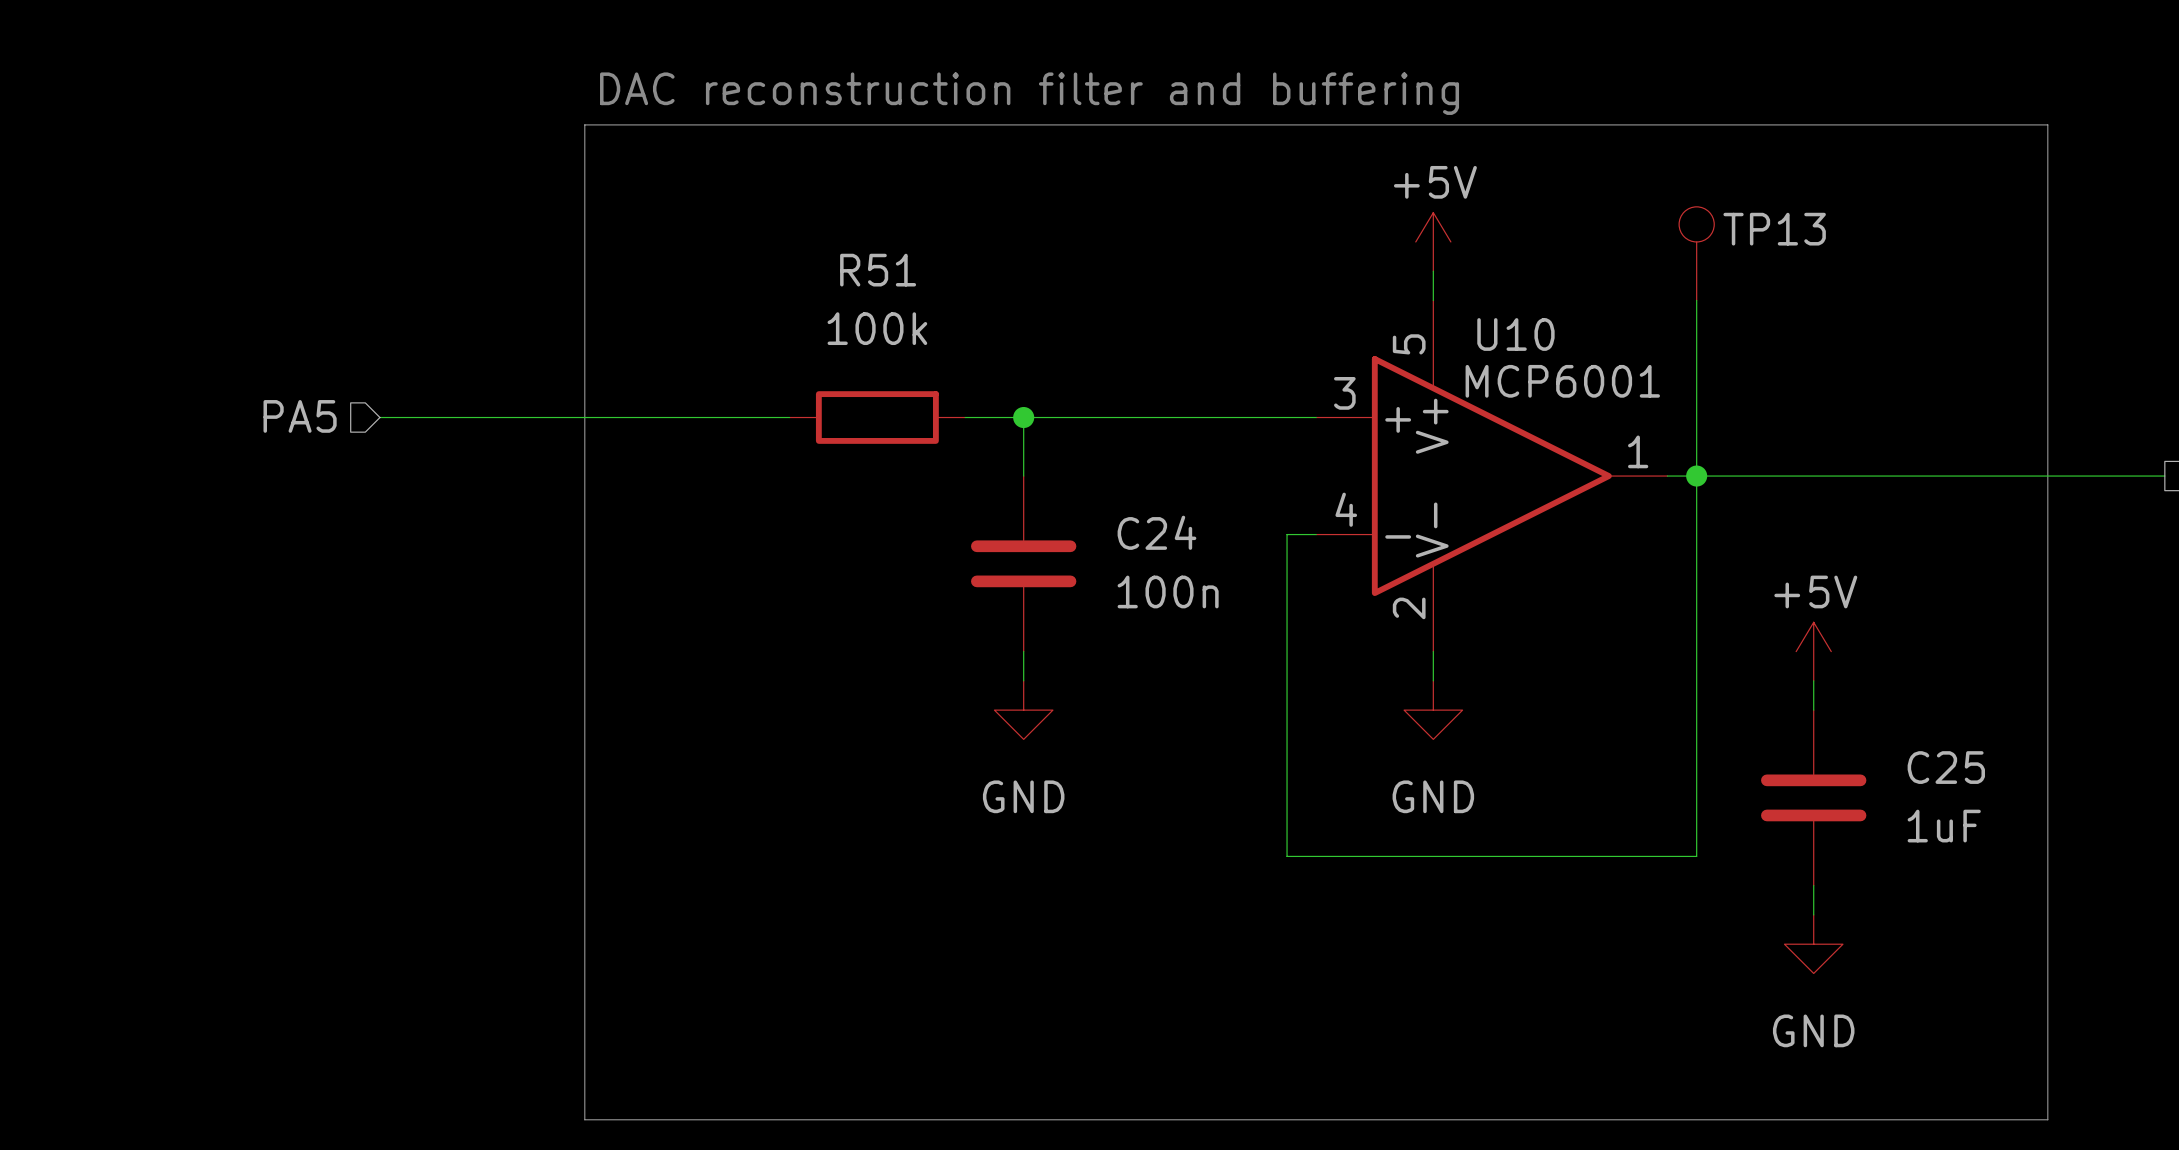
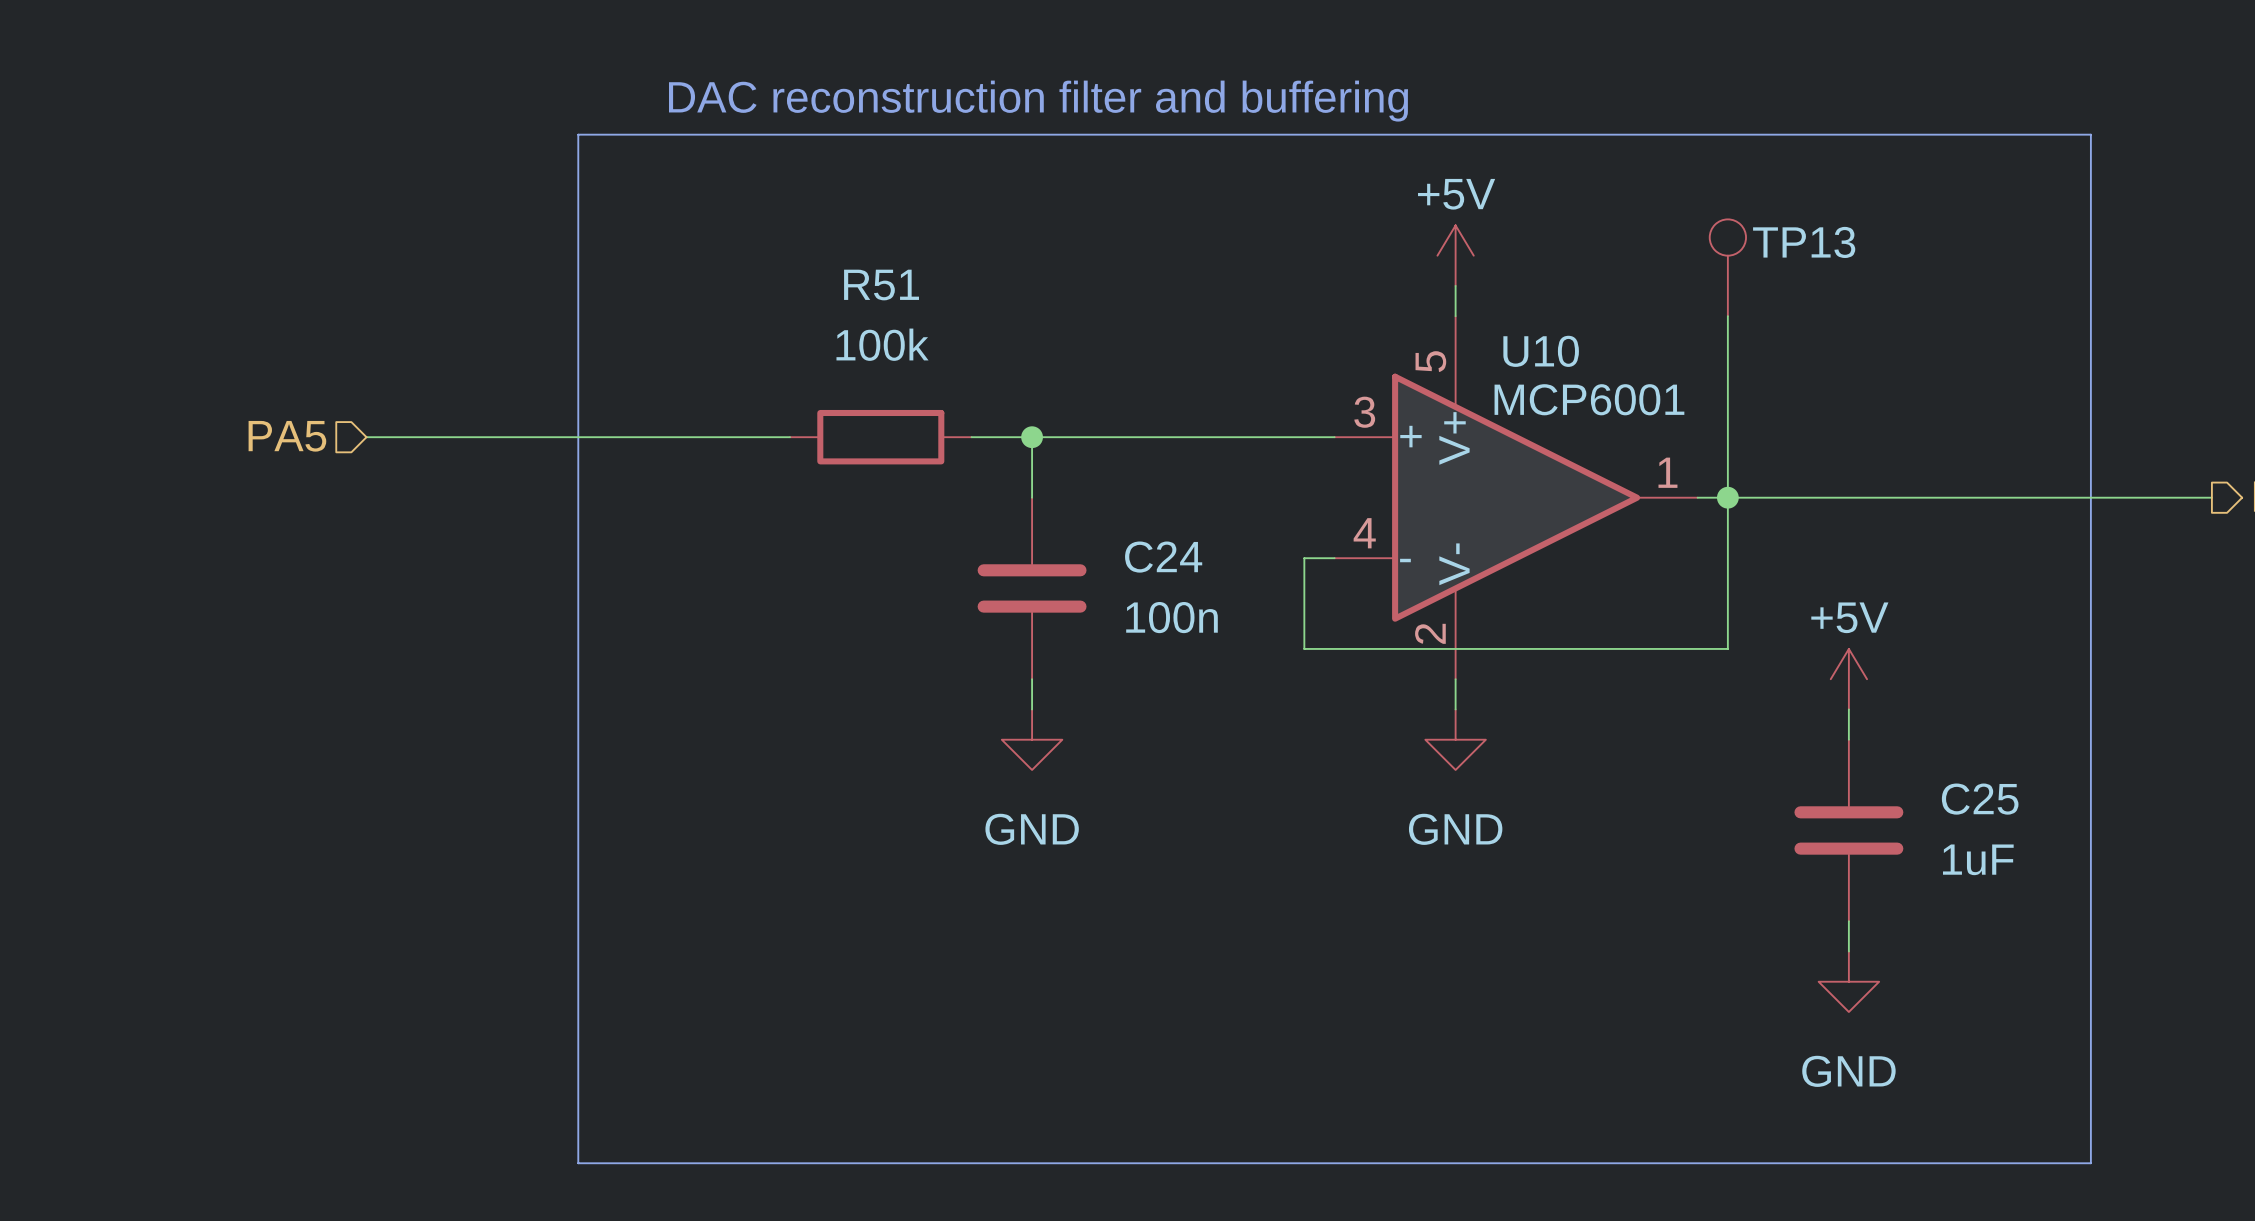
wire: (1287, 622) (1287, 856) (1696, 856) (1696, 622) -> (1304, 648) (1727, 648)

